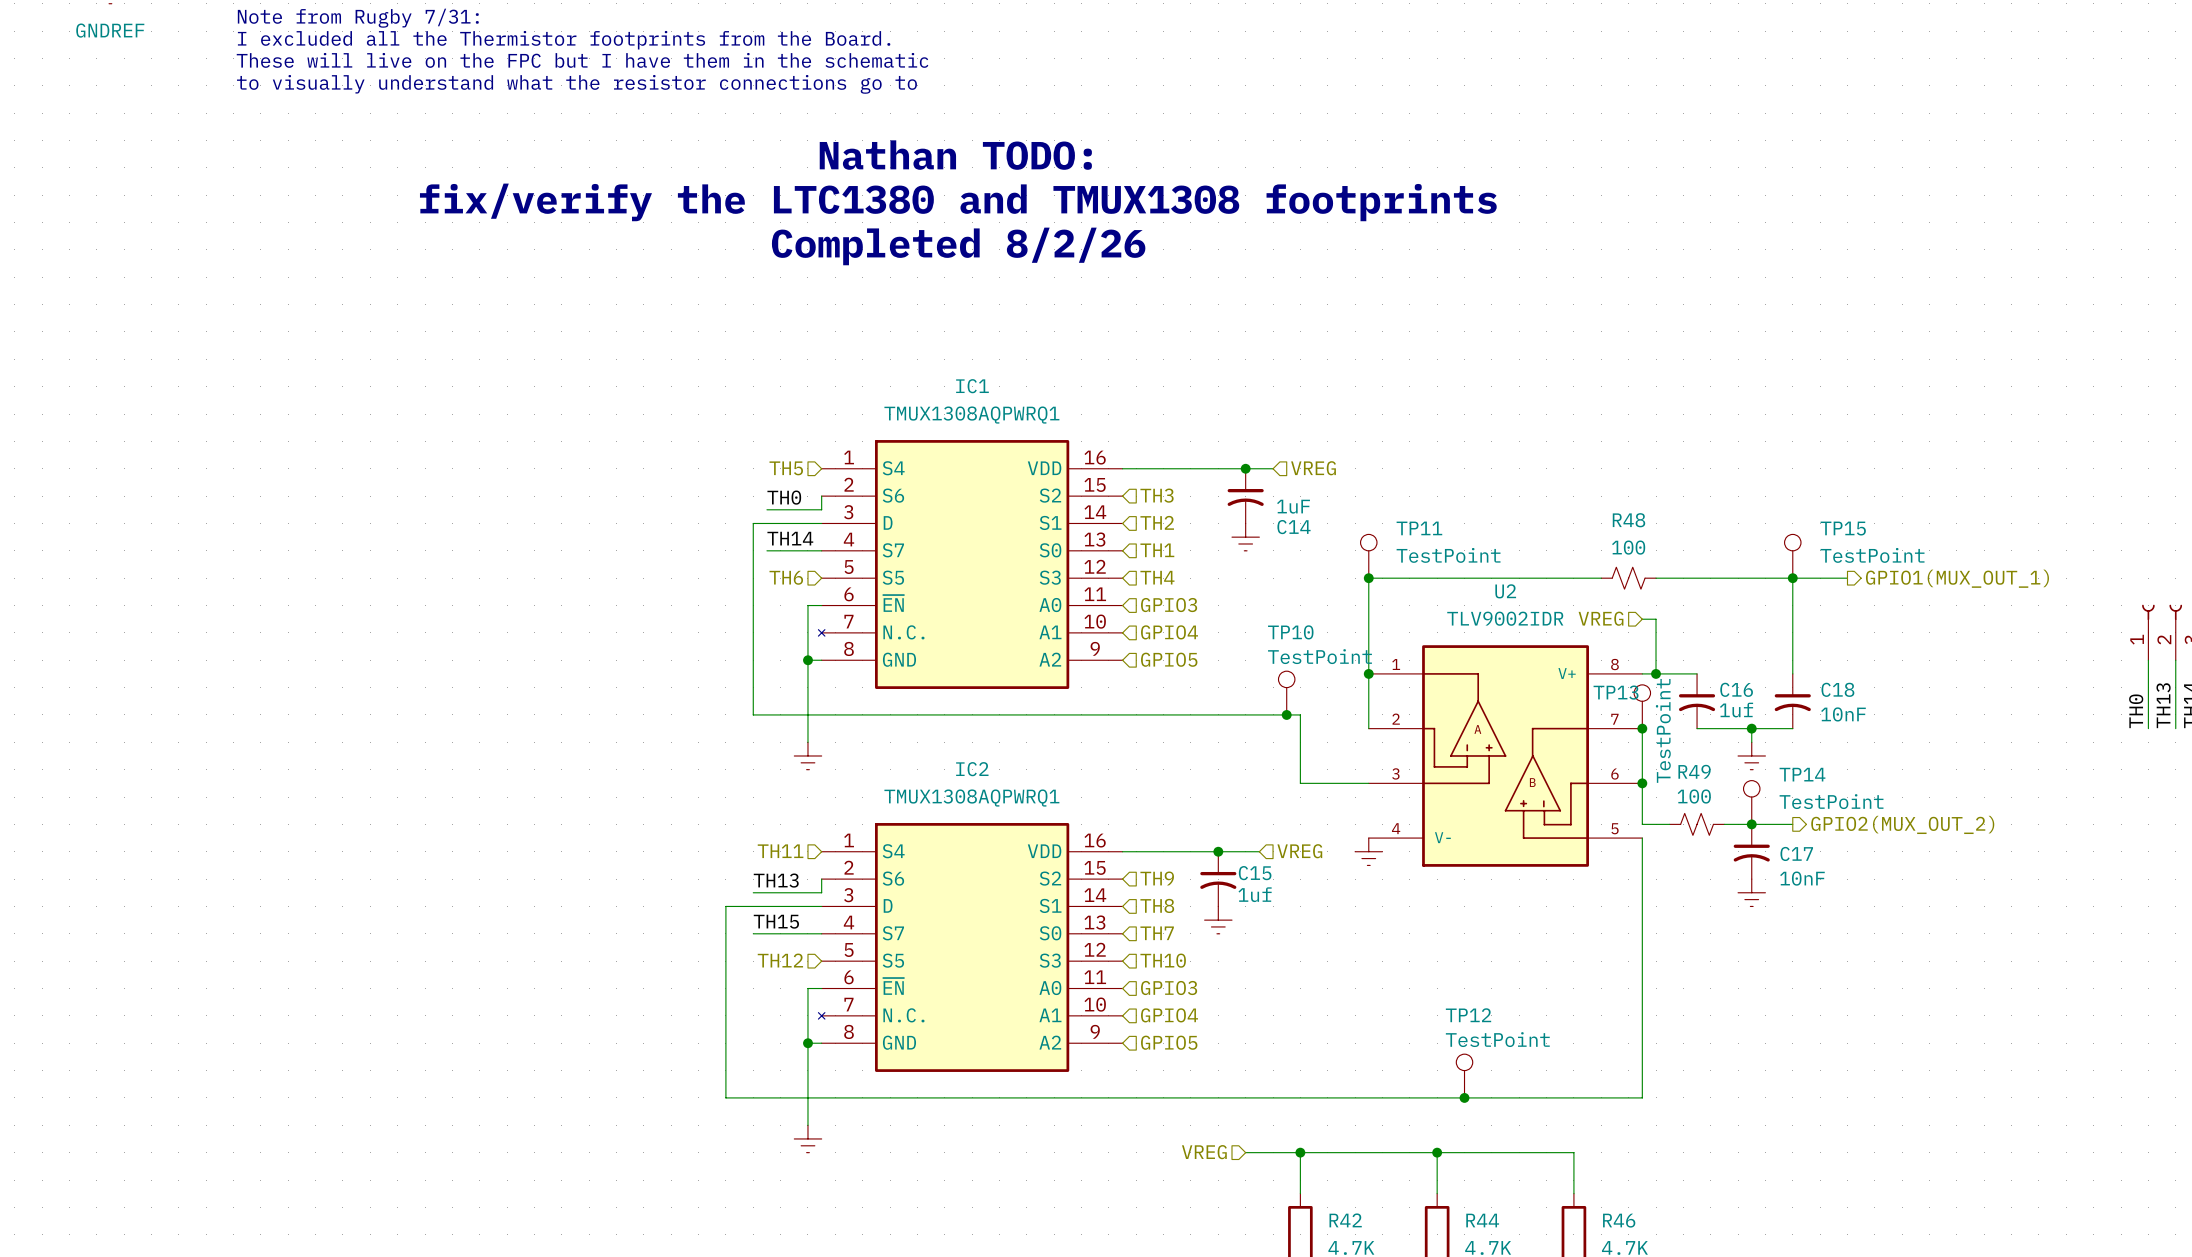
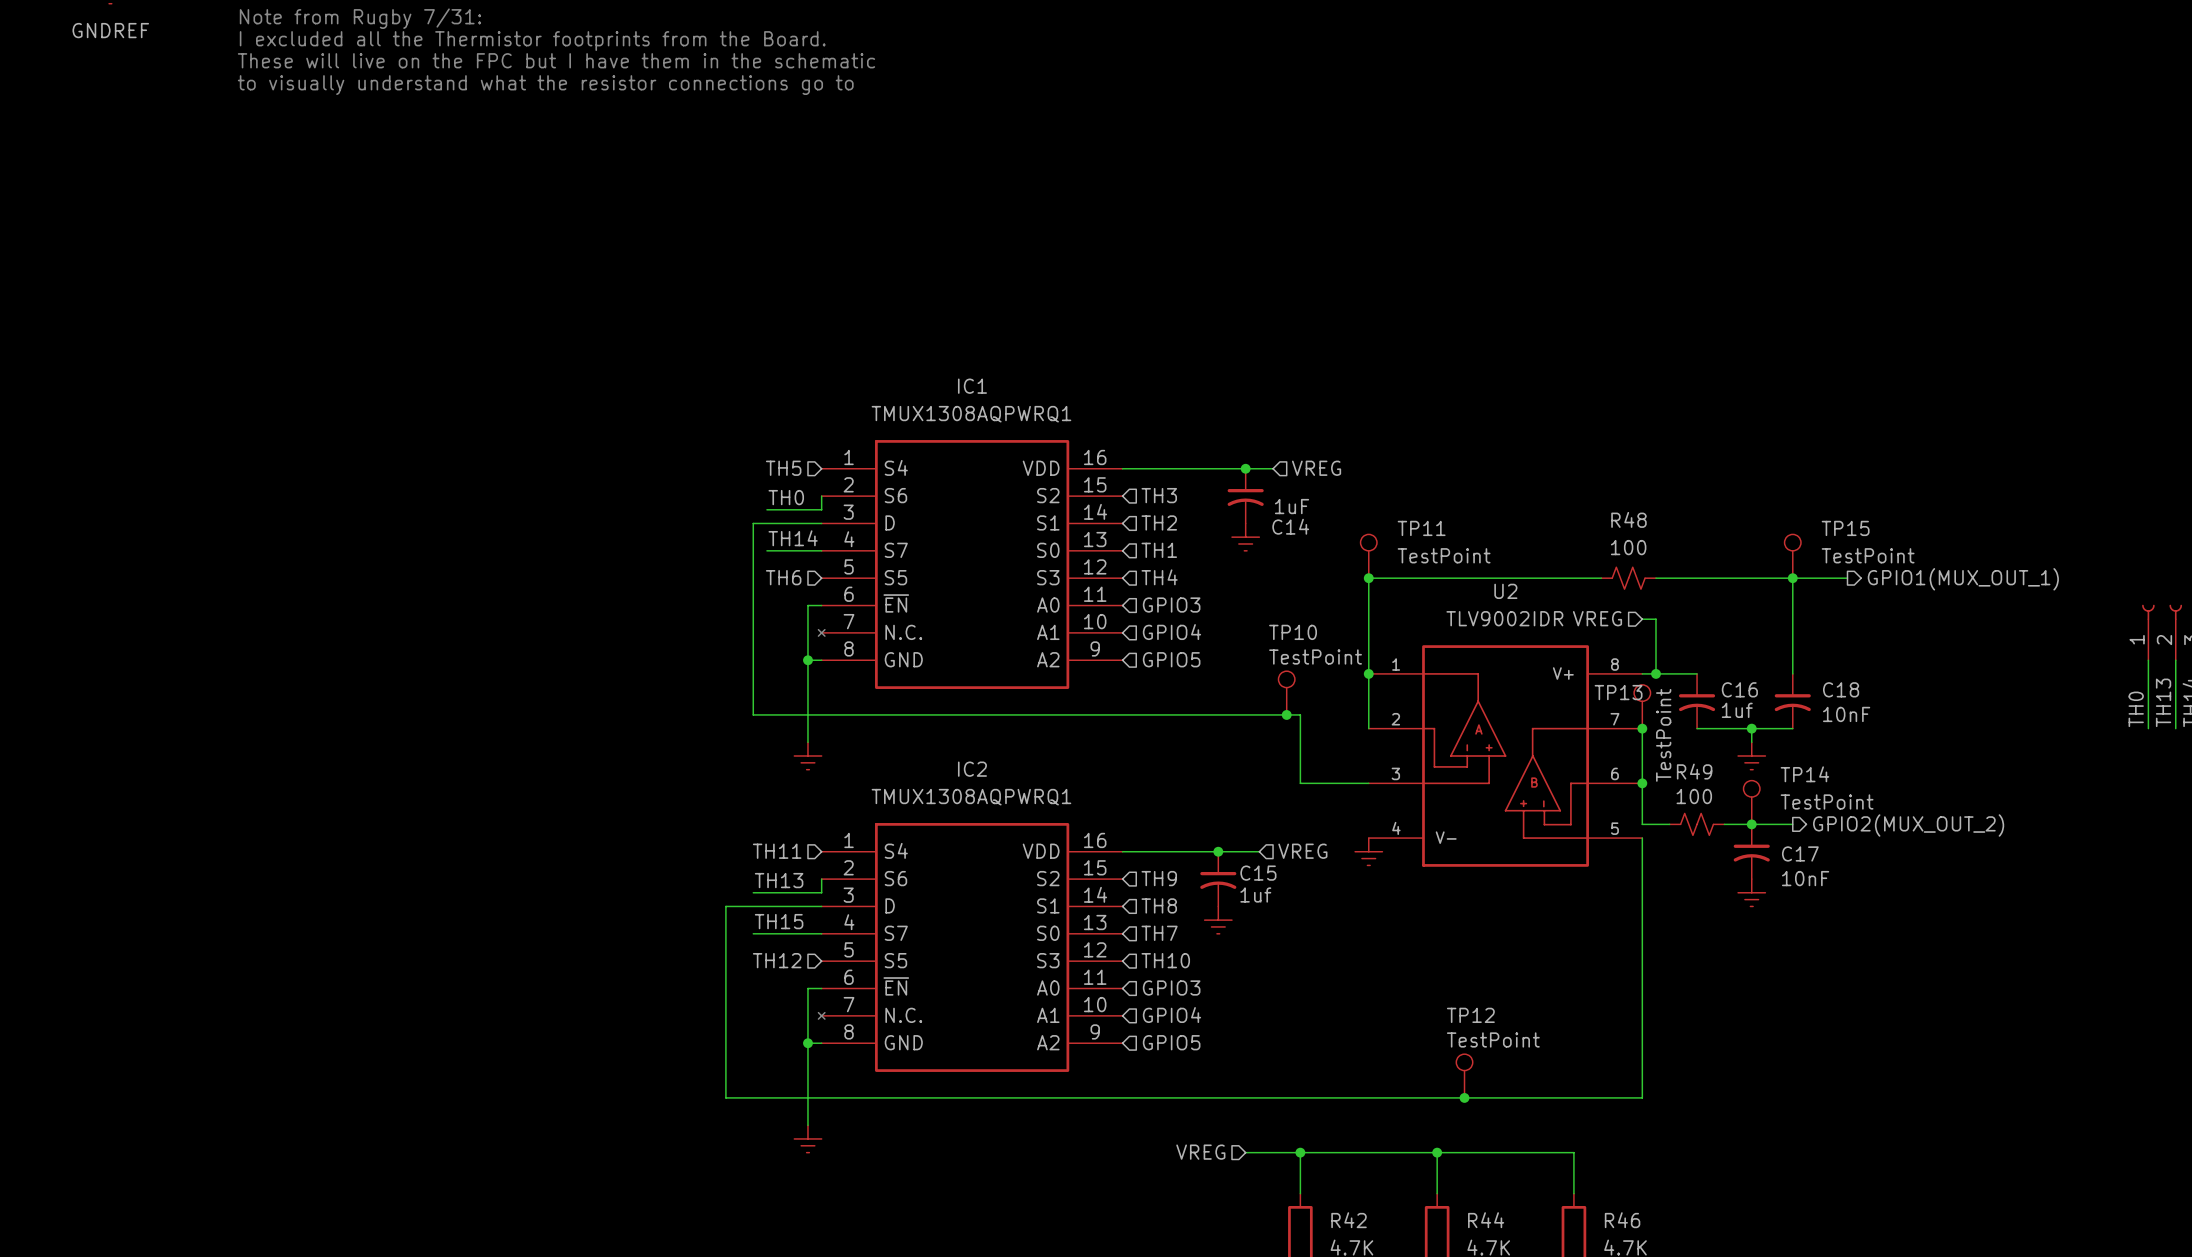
text: Nathan TODO: (955, 155) -> none
text: fix/verify the LTC1380 and TMUX1308 footprints (958, 202) -> none
text: Completed 8/2/26 (958, 246) -> none

